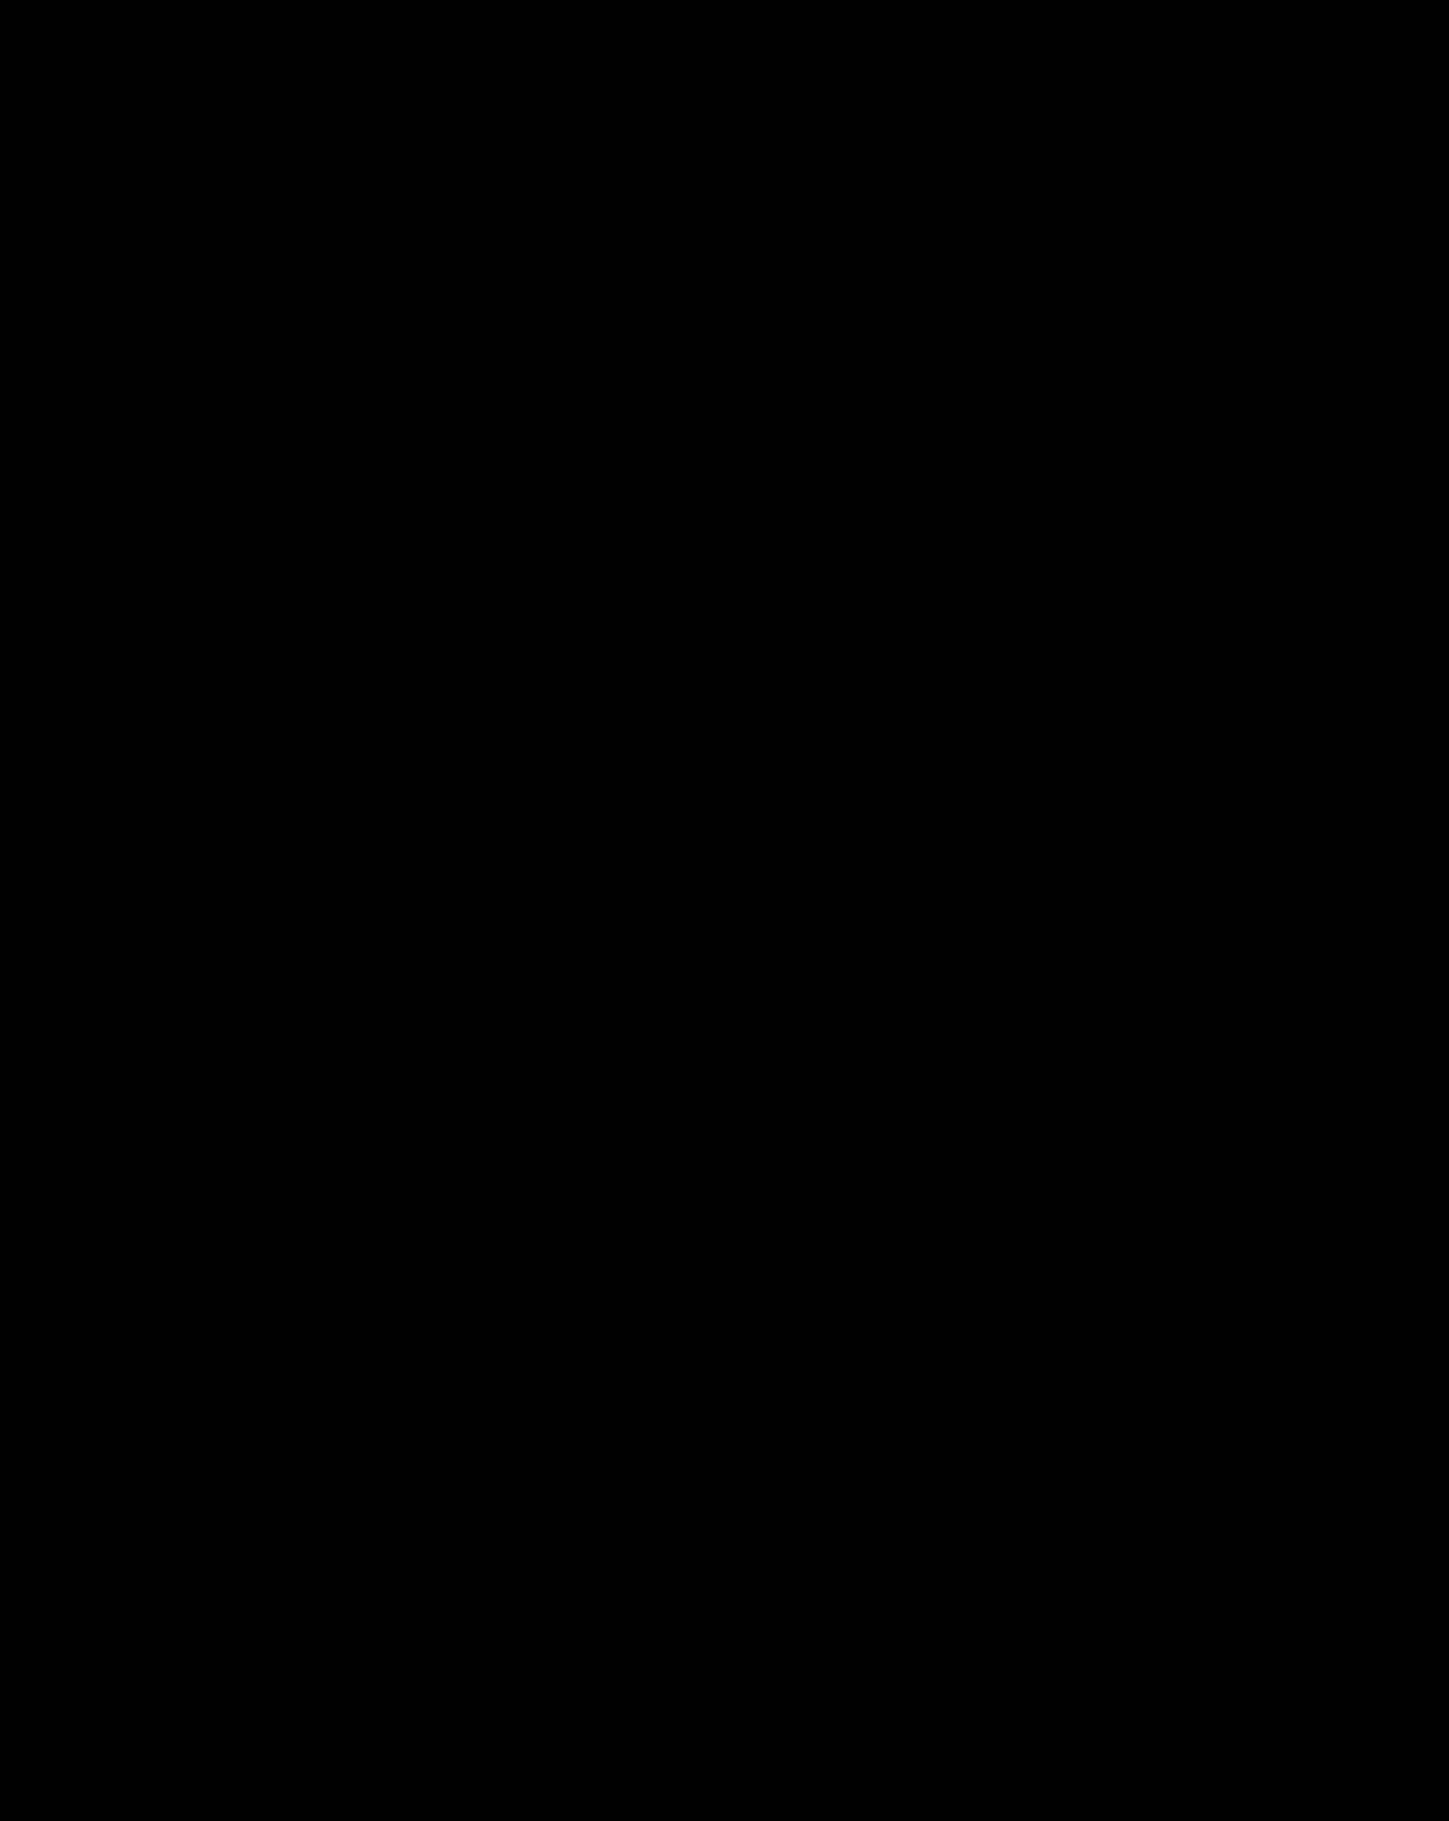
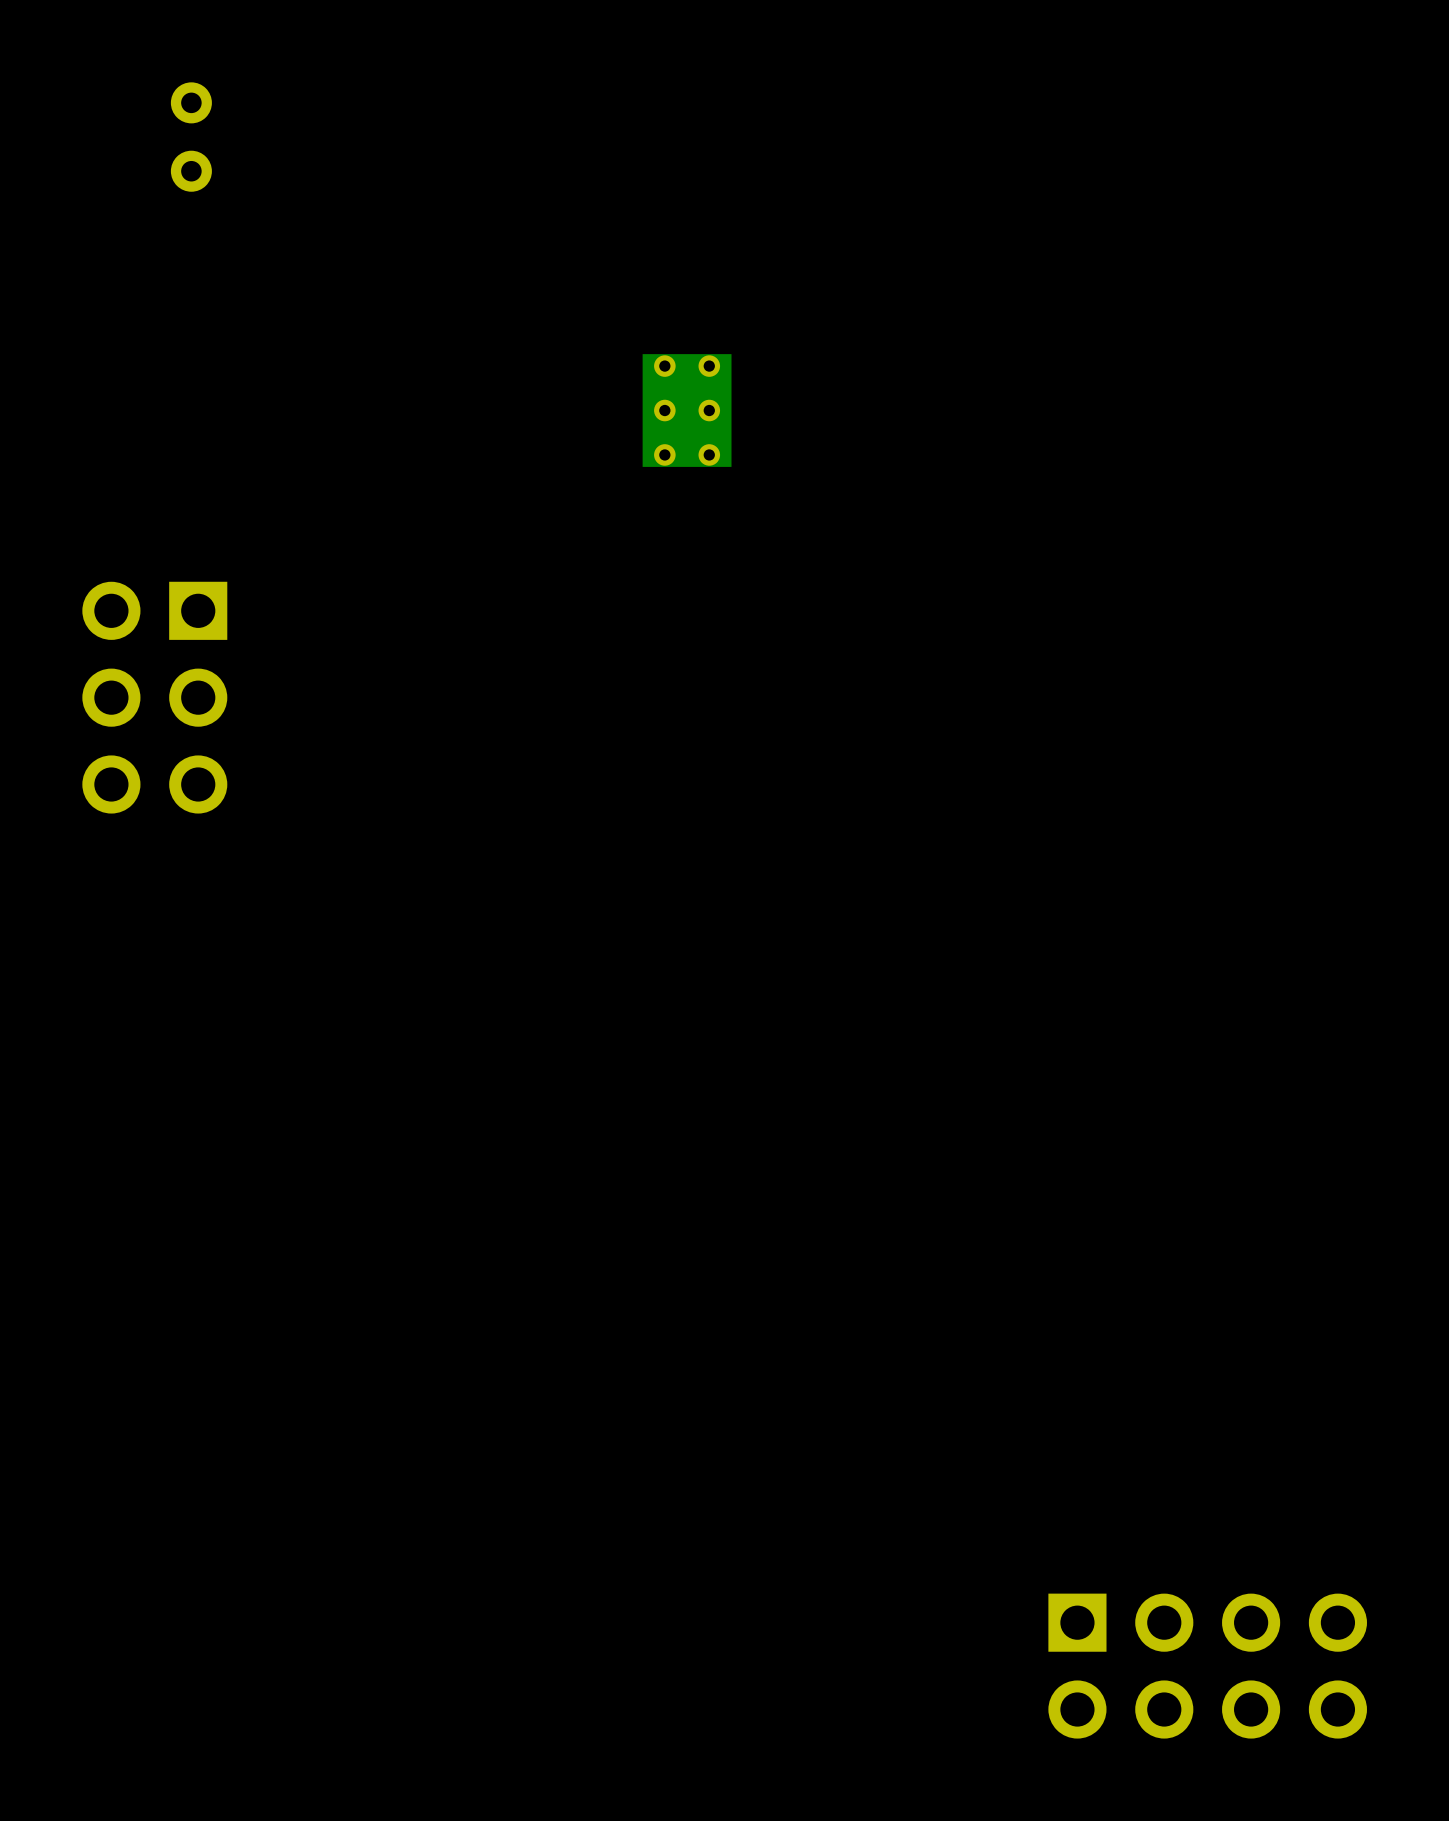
part: none -> (191, 137)
part: none -> (687, 410)
part: none -> (154, 697)
part: none -> (1207, 1666)

